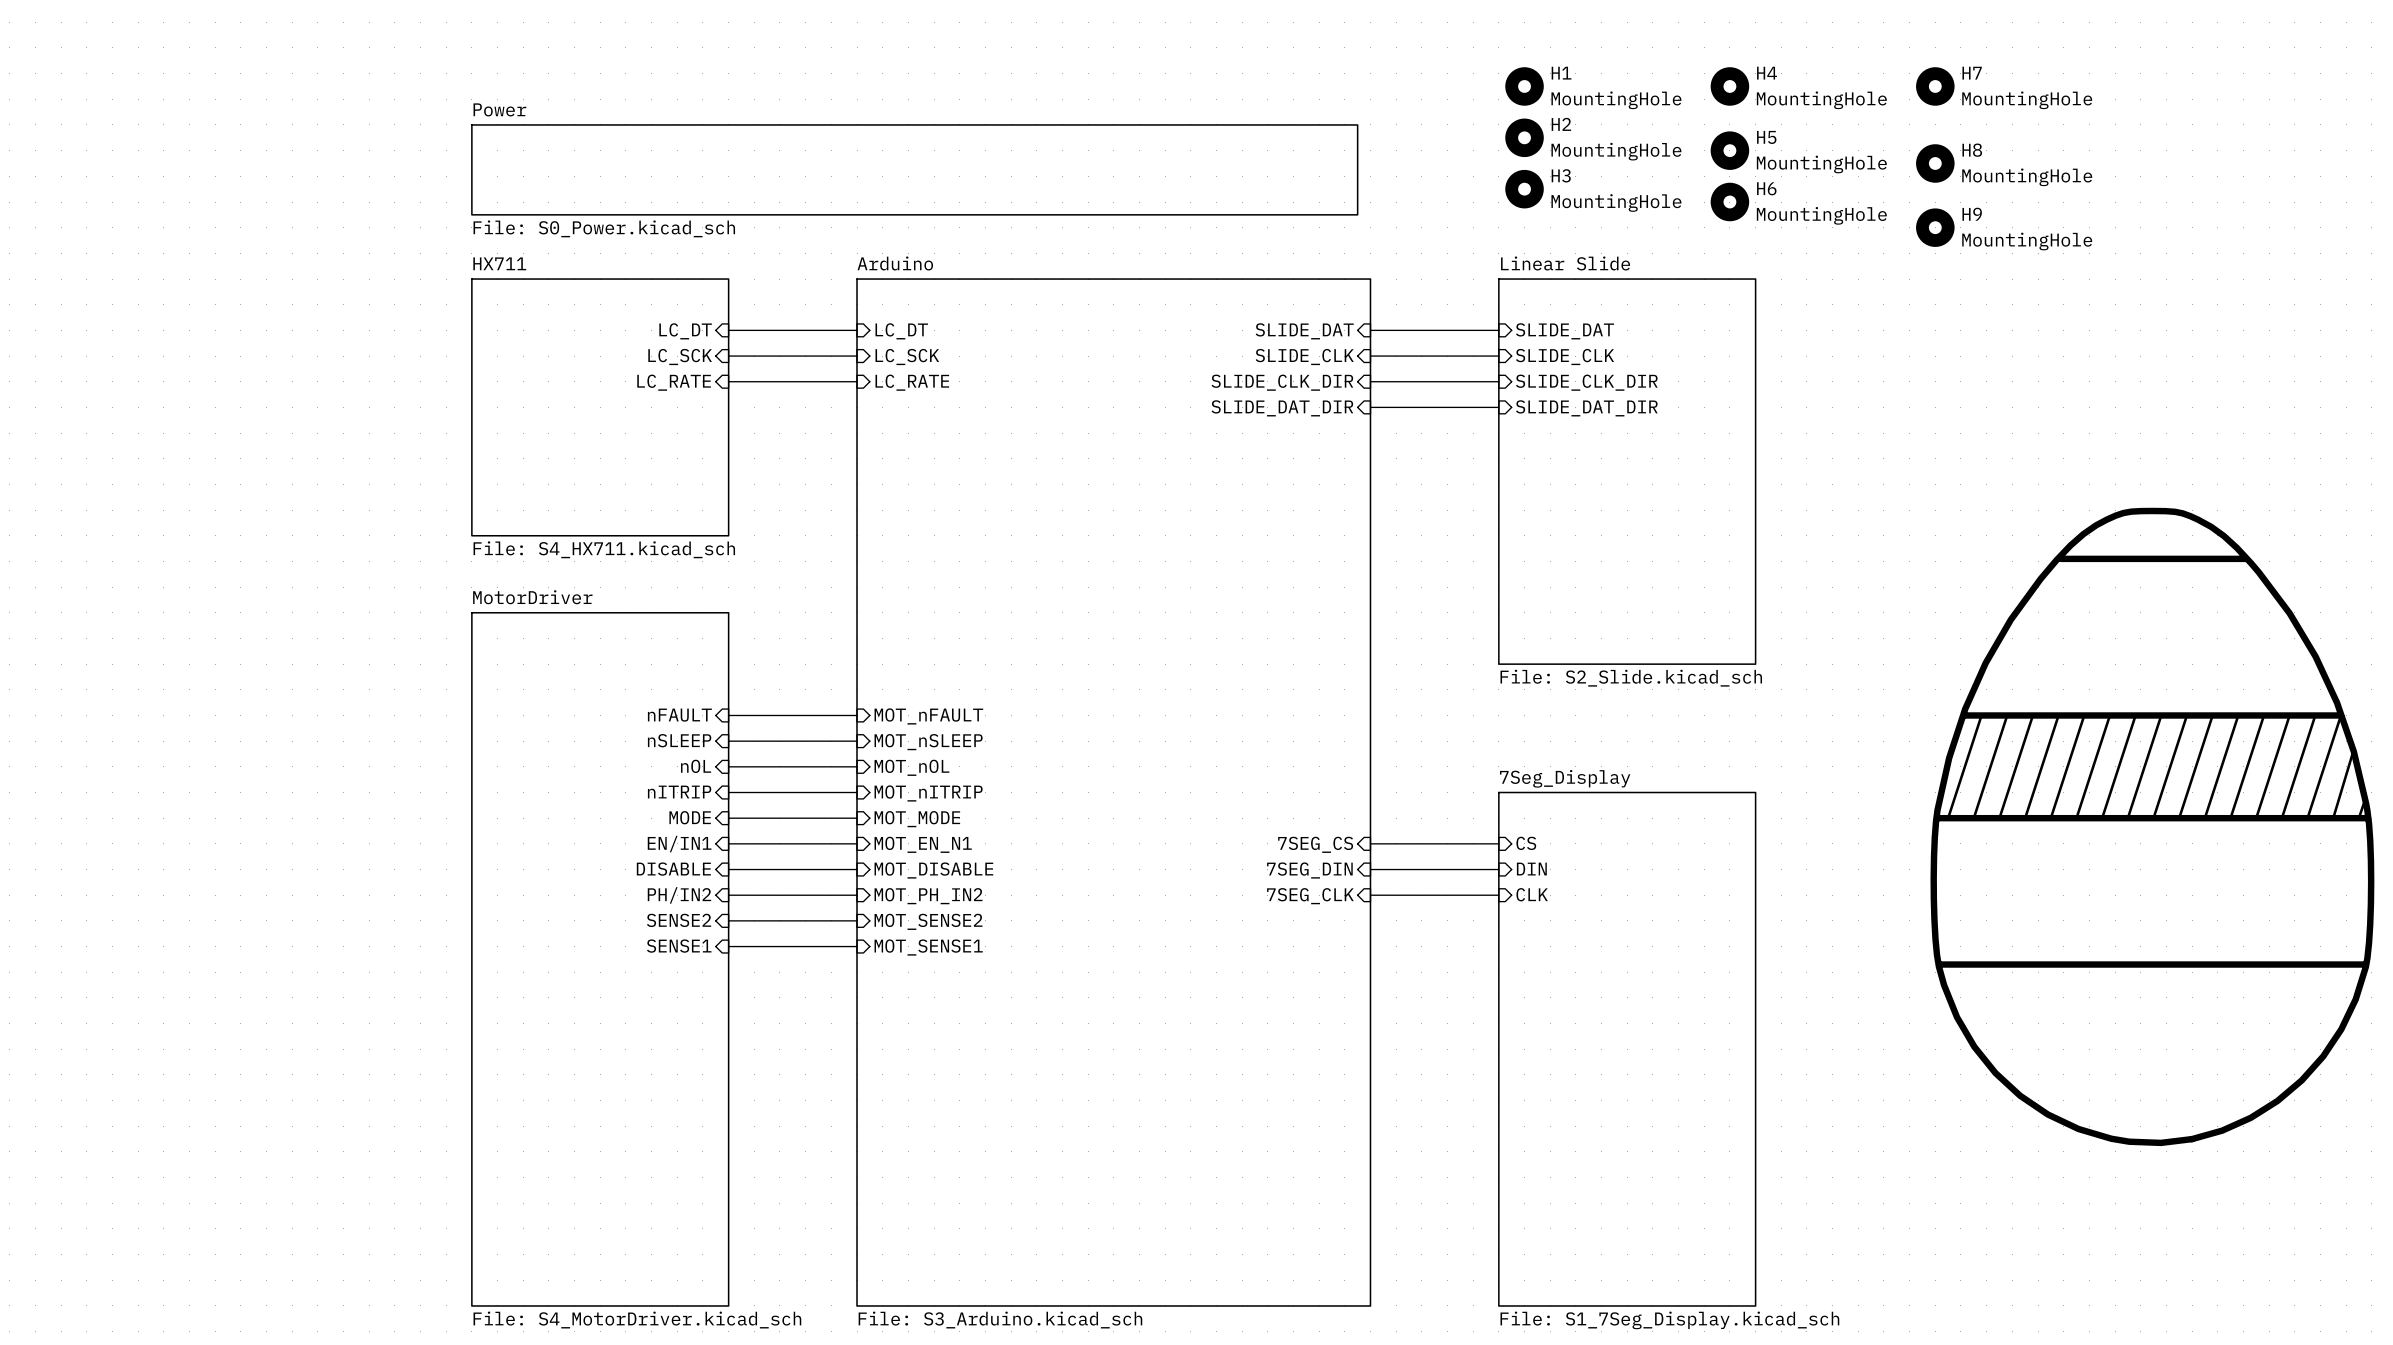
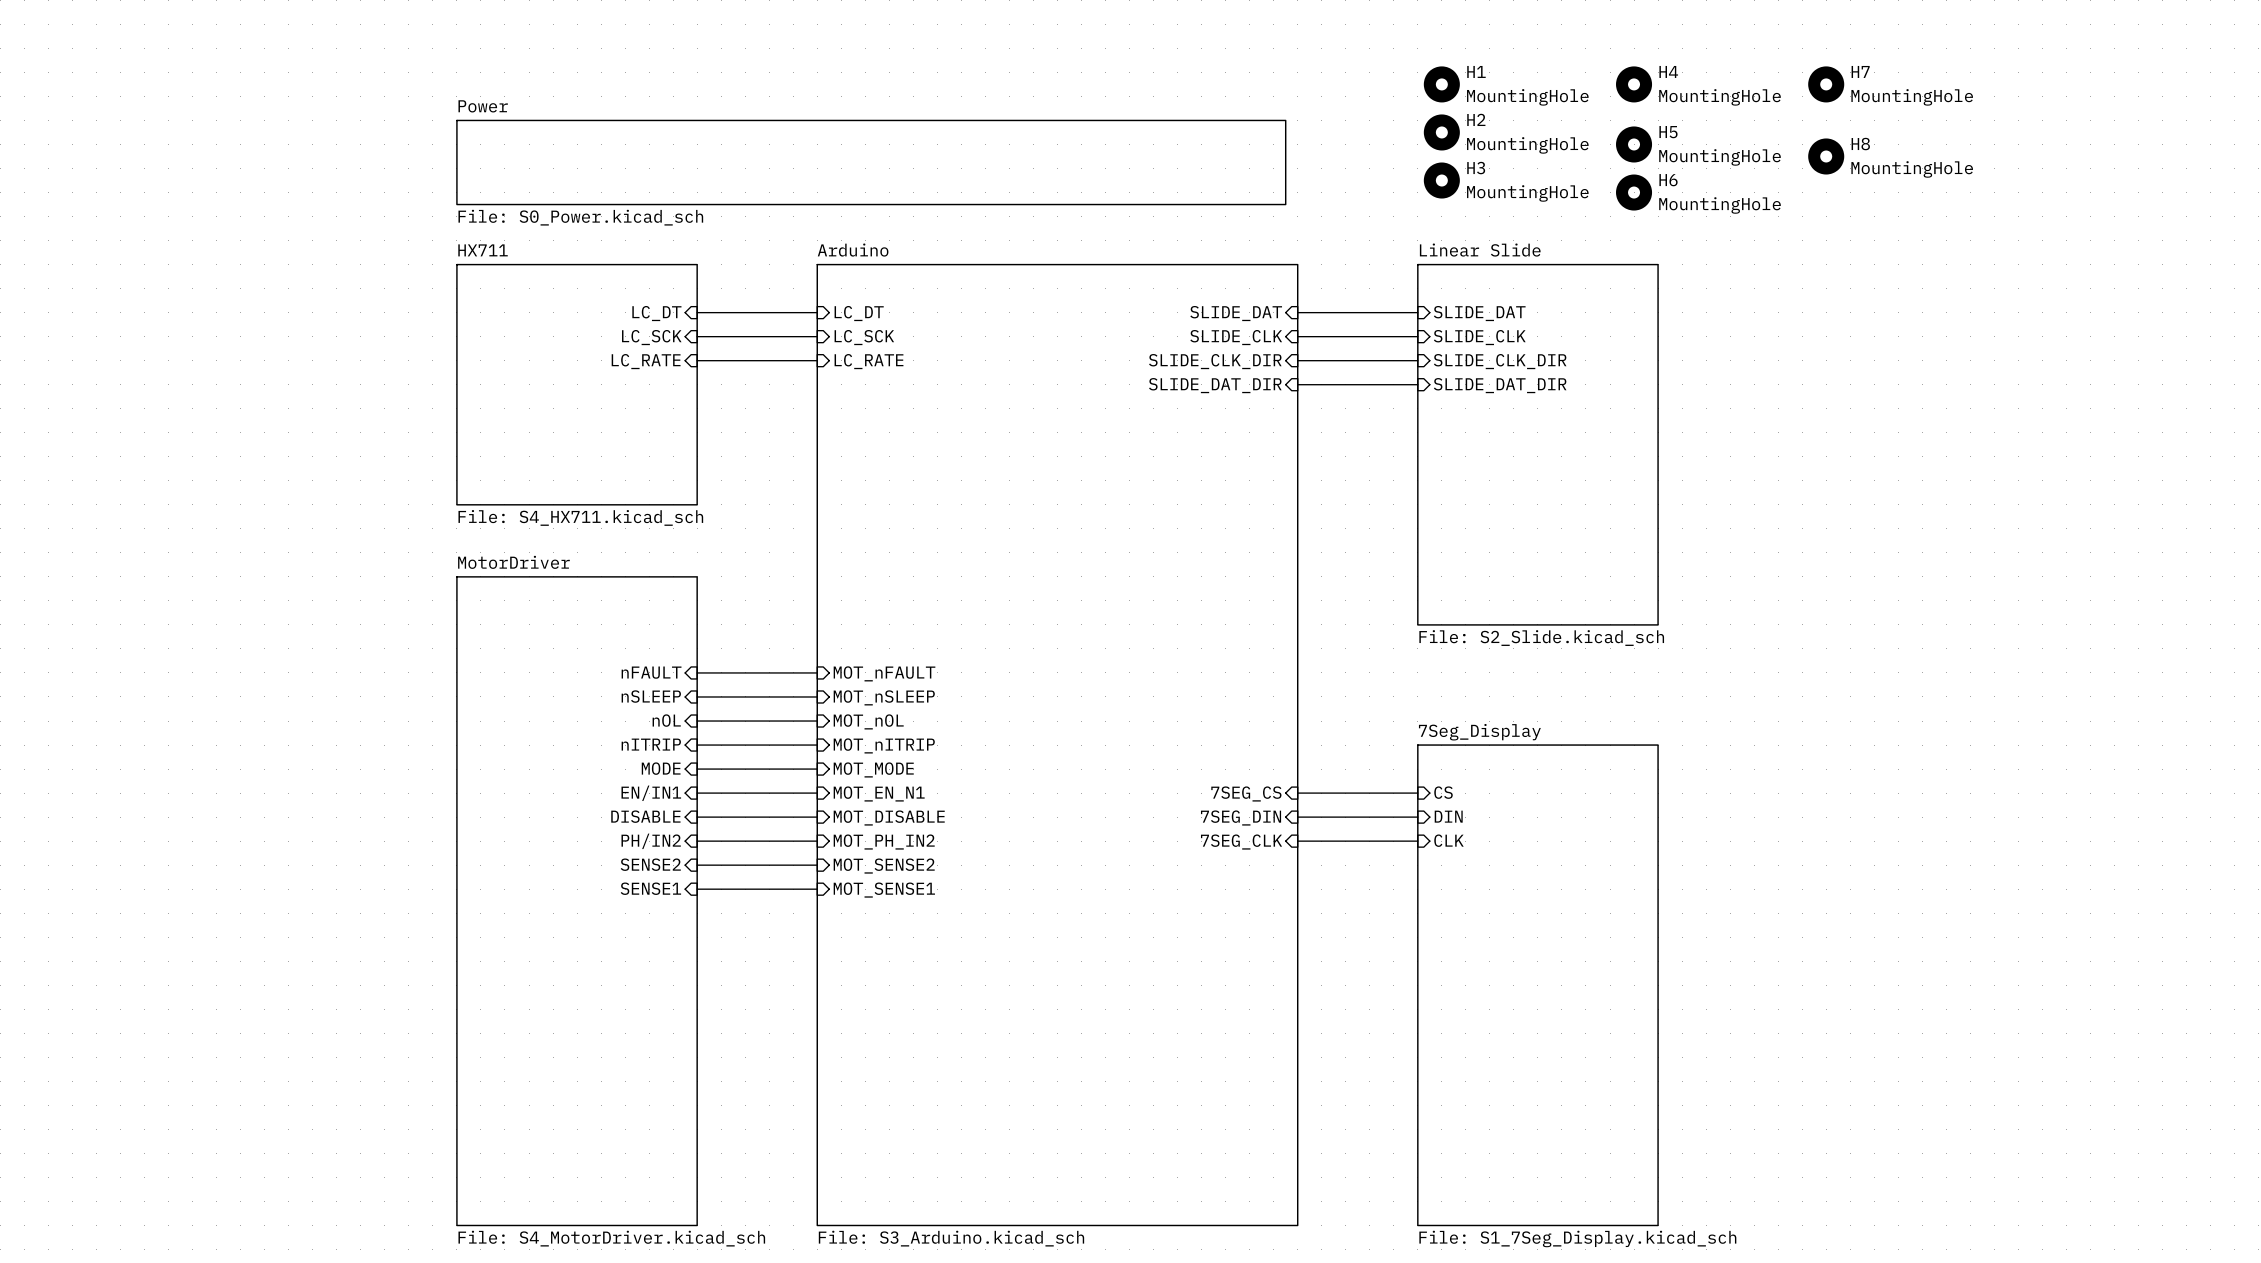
H9: MountingHole (1935, 227) -> none
part: (2152, 826) -> none

